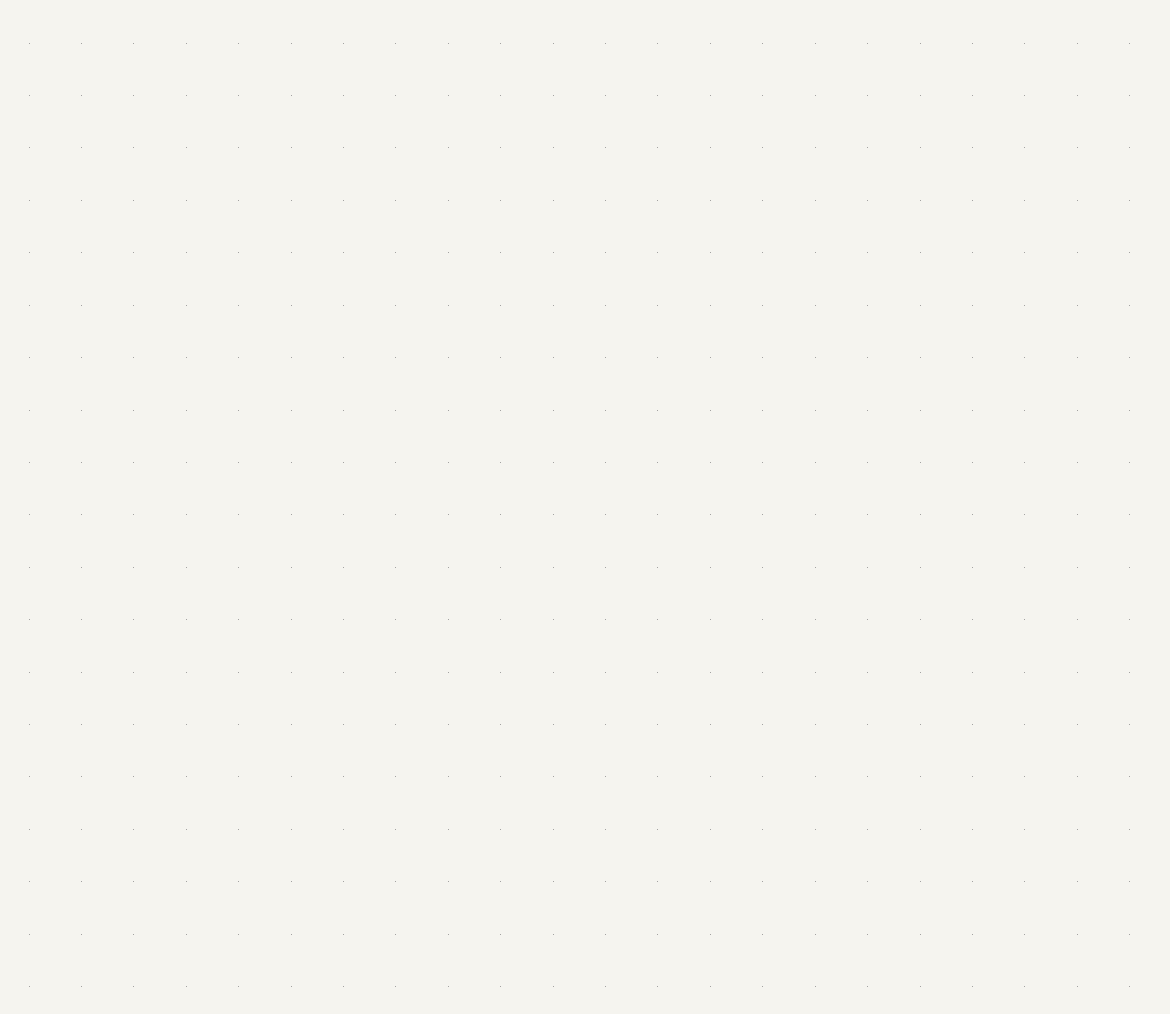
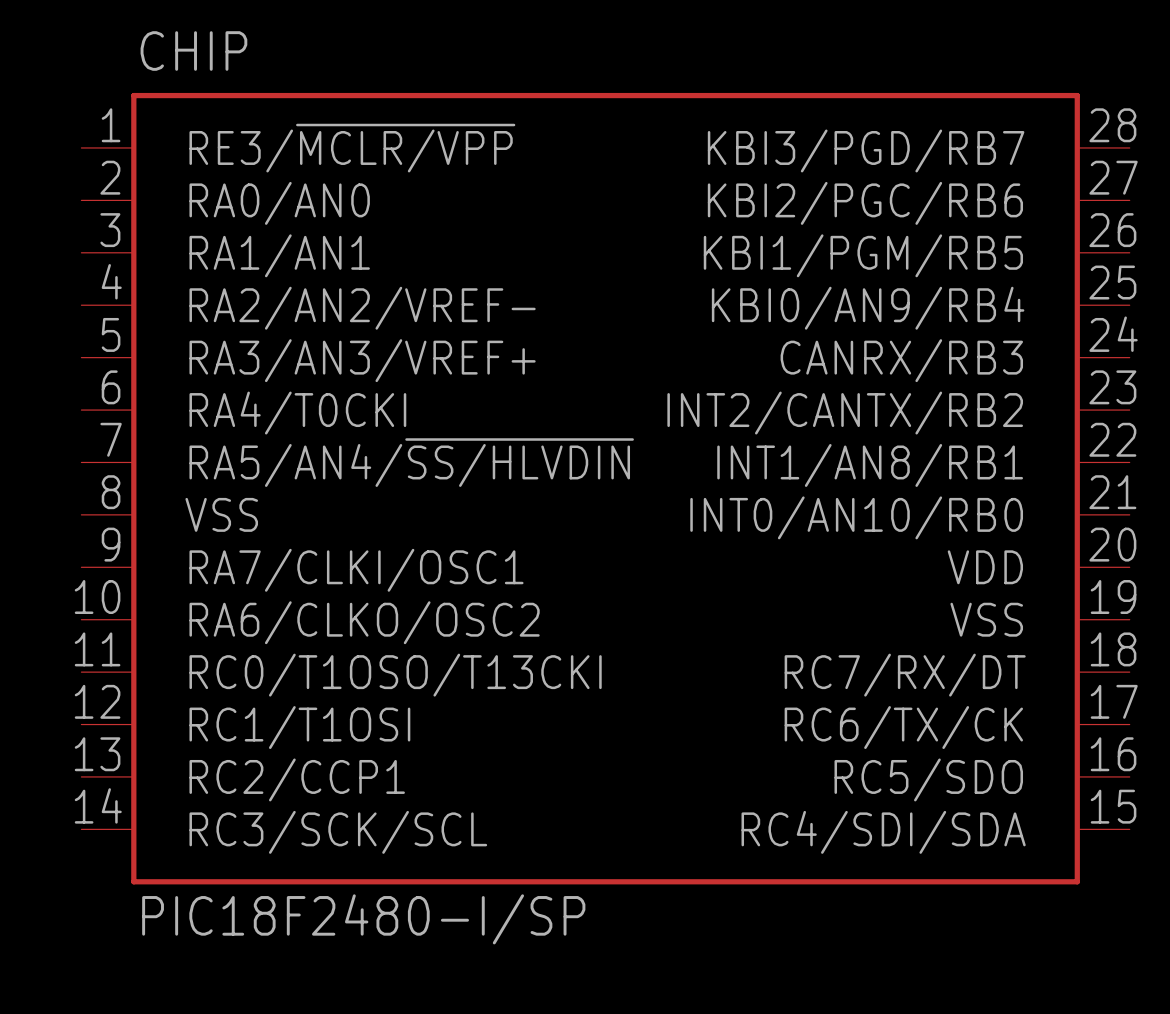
CHIP: none -> PIC18F2480-I/SP (605, 488)

